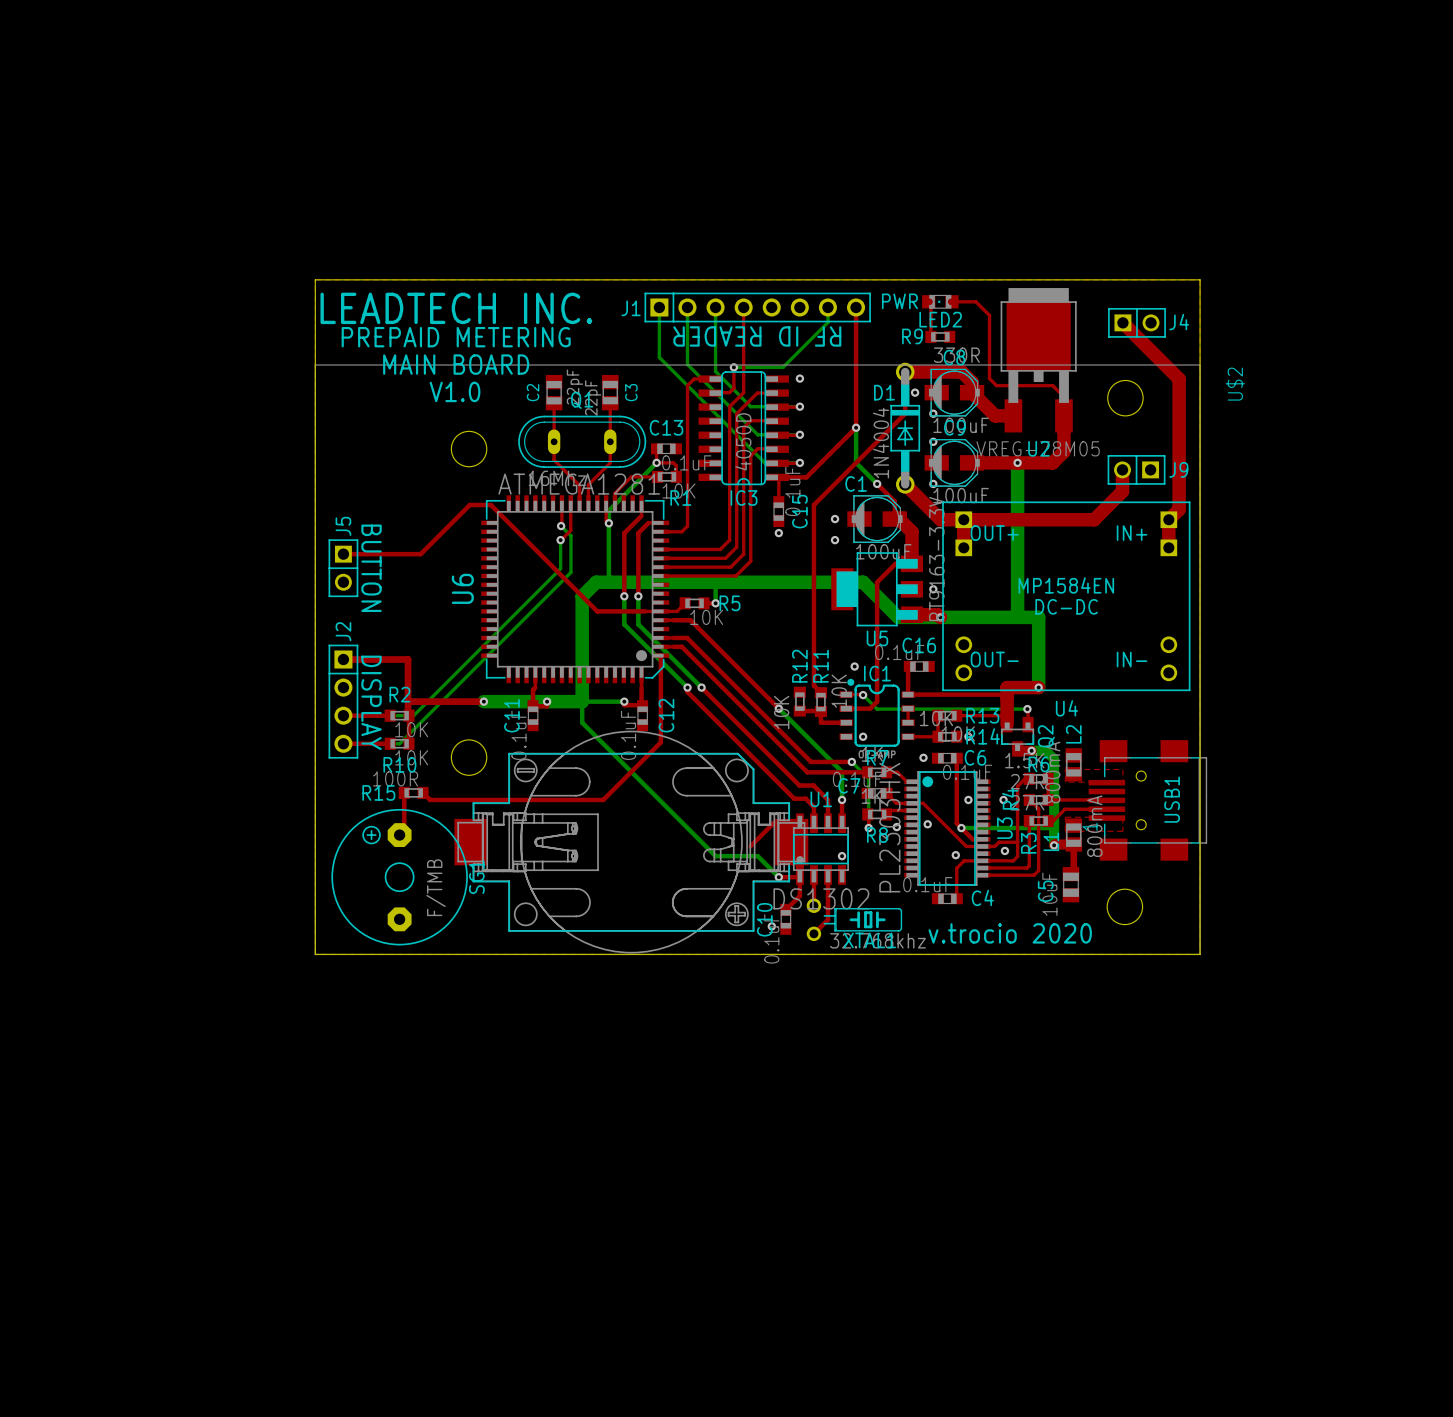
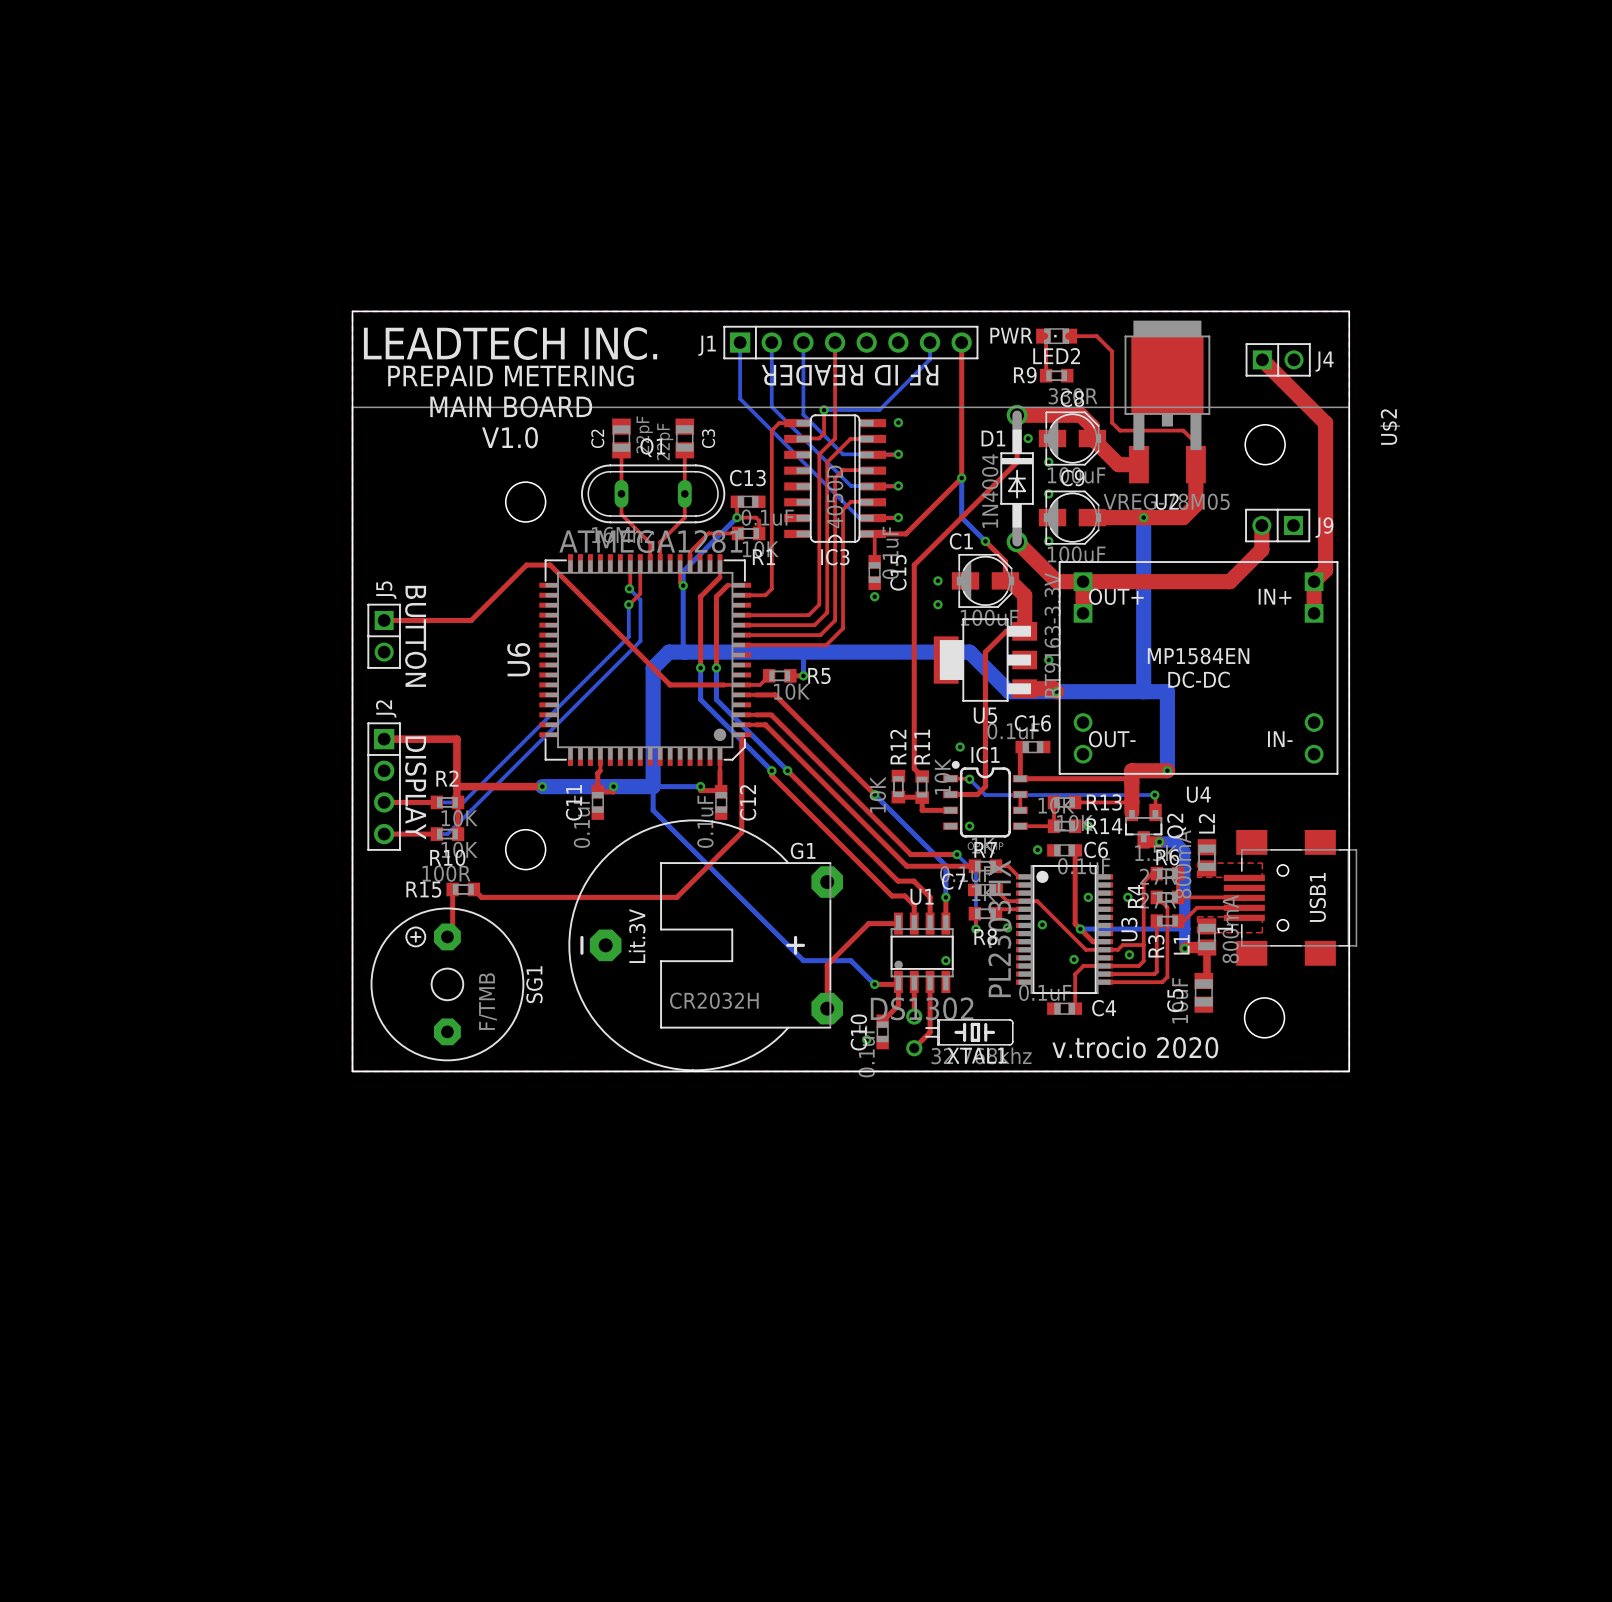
drawing: [519, 730, 743, 954] -> none
G1: none -> CR2032H (705, 945)
part: (631, 842) -> none
top track: none -> (843, 949) (827, 965) (827, 1008)

